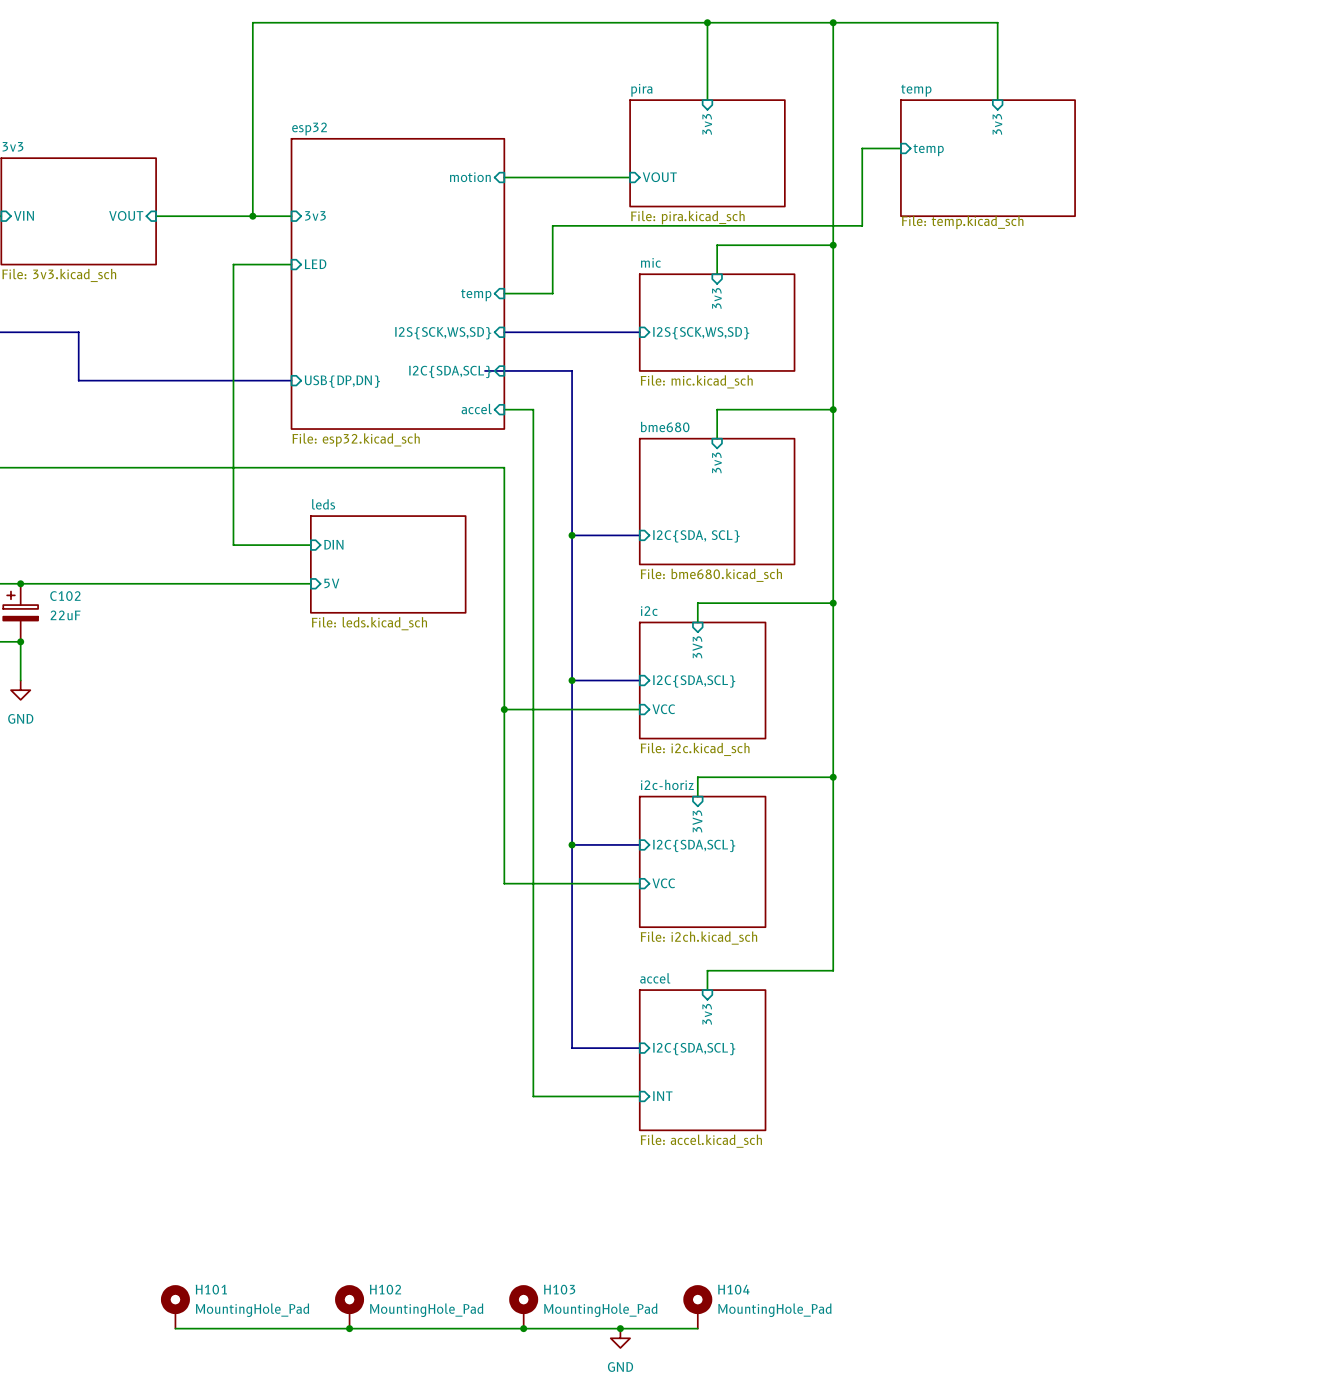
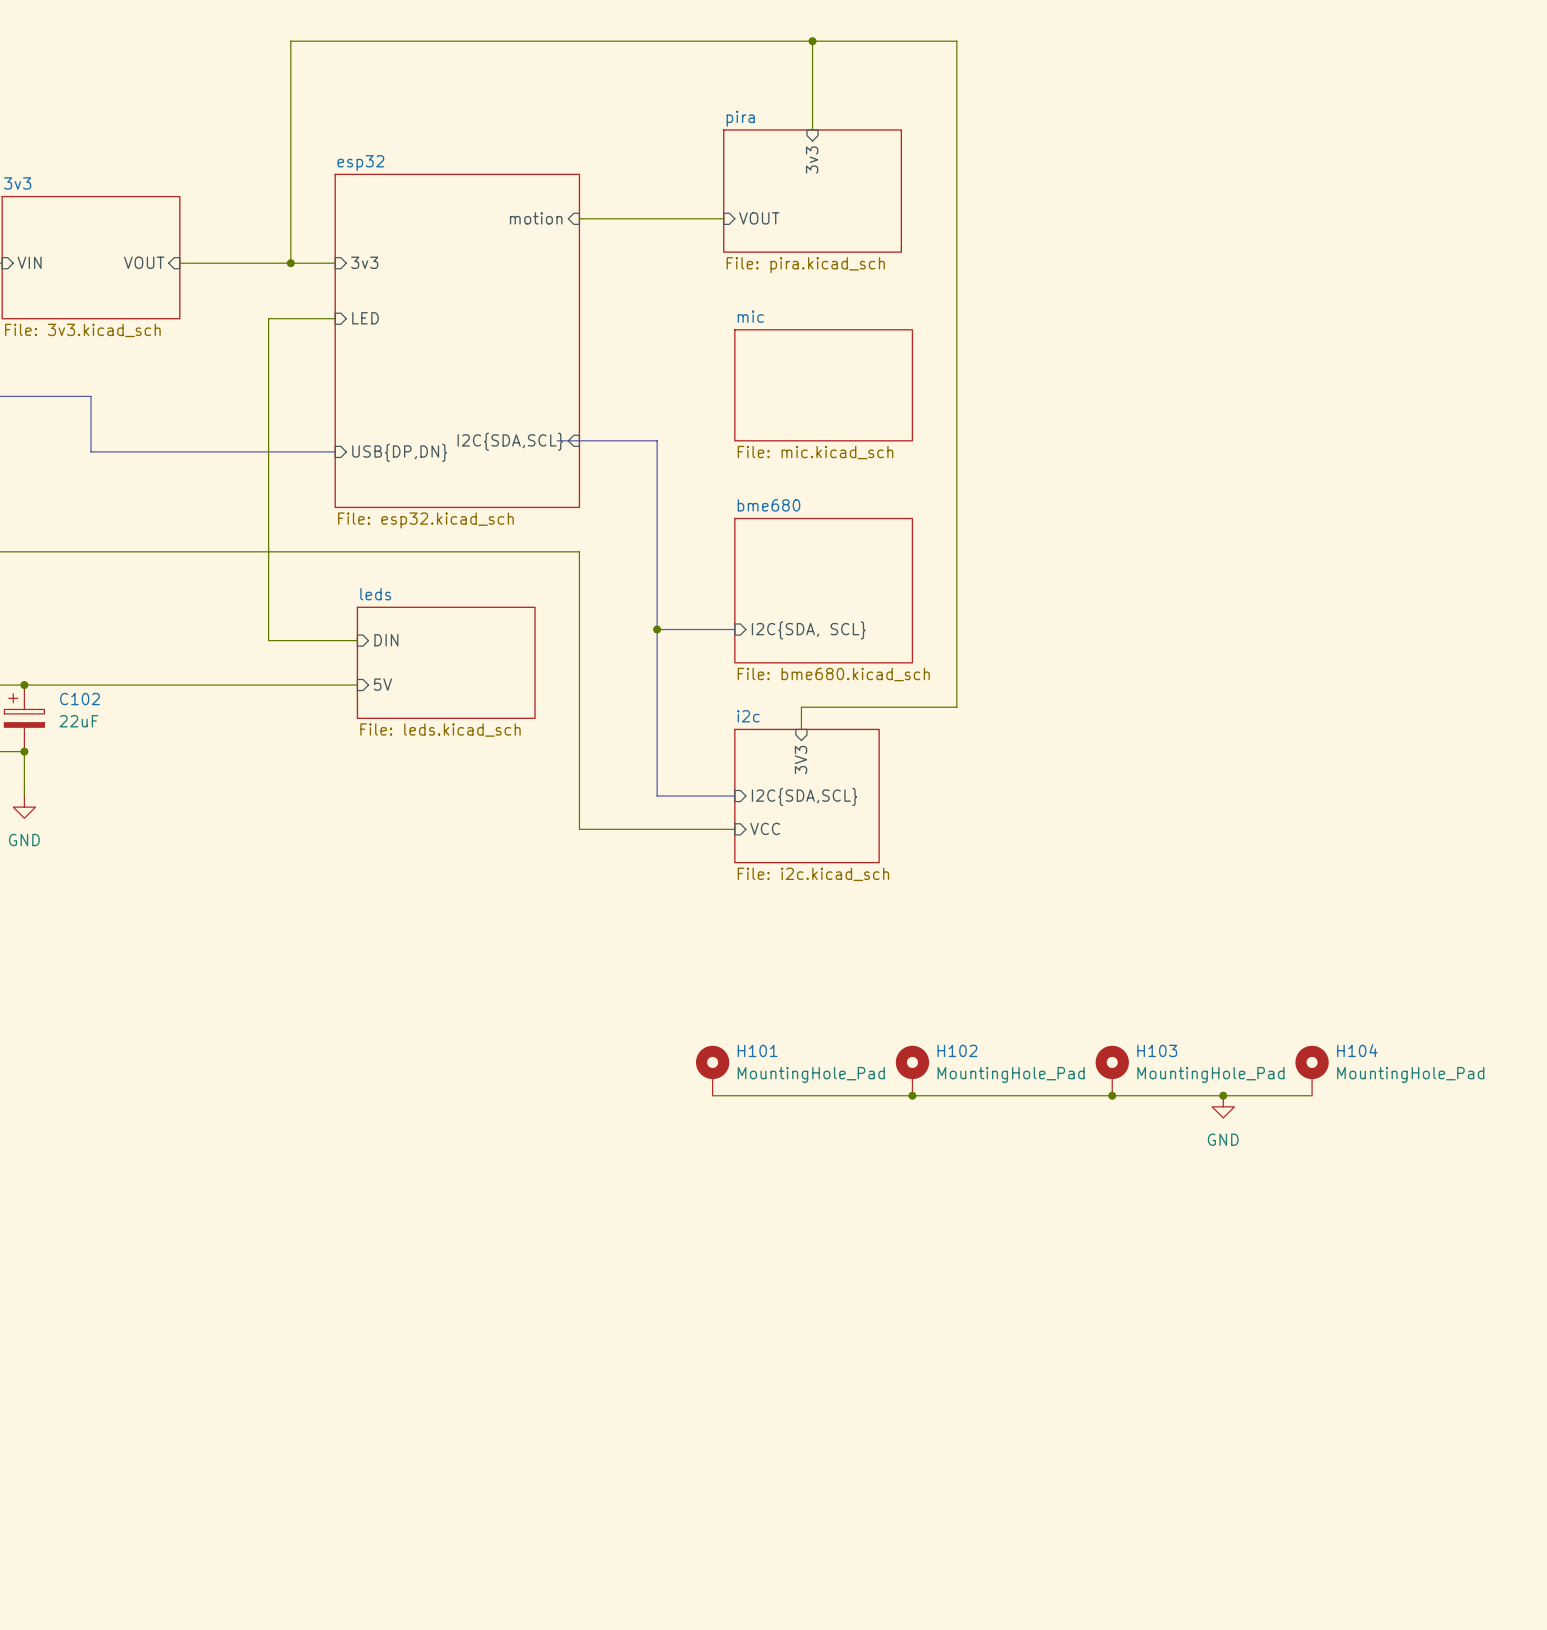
wire: (833, 22) (997, 22) (997, 100) -> none
junction: (833, 22) -> none
sheet pin: 3v3 (997, 124) -> none
wire: (900, 148) (862, 148) (862, 225) (552, 225) (552, 293) (504, 293) -> none
sheet pin: temp (928, 150) -> none
sheet temp: File: temp.kicad_sch (988, 158) -> none
wire: (833, 245) (717, 245) (717, 274) -> none
junction: (833, 245) -> none
sheet pin: temp (476, 295) -> none
sheet pin: 3v3 (716, 298) -> none
bus: (504, 332) (639, 332) -> none
sheet pin: I2S{SCK,WS,SD} (443, 333) -> none
sheet pin: I2S{SCK,WS,SD} (701, 333) -> none
sheet pin: accel (476, 409) -> none
wire: (504, 409) (533, 409) (533, 1096) (639, 1096) -> none
wire: (833, 409) (717, 409) (717, 438) -> none
junction: (833, 409) -> none
sheet pin: 3v3 (716, 462) -> none
wire: (833, 603) (833, 970) (707, 970) (707, 990) -> none
junction: (833, 603) -> none
bus: (572, 680) (572, 1048) (639, 1048) -> none
junction: (572, 680) -> none
wire: (504, 709) (504, 883) (639, 883) -> none
junction: (504, 709) -> none
wire: (833, 777) (697, 777) (697, 796) -> none
junction: (833, 777) -> none
sheet pin: 3V3 (697, 821) -> none
bus: (572, 844) (639, 844) -> none
junction: (572, 844) -> none
sheet pin: I2C{SDA,SCL} (694, 845) -> none
sheet i2c-horiz: File: i2ch.kicad_sch (702, 861) -> none
sheet pin: VCC (663, 883) -> none
wire: none -> (712, 1095) (1312, 1095)
junction: none -> (912, 1095)
junction: none -> (1112, 1095)
junction: none -> (1223, 1095)
power symbol: none -> GND (1223, 1106)
sheet pin: 3v3 (707, 1014) -> none
sheet pin: I2C{SDA,SCL} (694, 1049) -> none
sheet accel: File: accel.kicad_sch (702, 1060) -> none
sheet pin: INT (662, 1096) -> none
H101 position: (175, 1306) -> (712, 1070)
H102 position: (349, 1306) -> (912, 1070)
H103 position: (523, 1306) -> (1112, 1070)
H104 position: (697, 1306) -> (1312, 1070)
wire: (175, 1328) (697, 1328) -> none
junction: (349, 1328) -> none
junction: (523, 1328) -> none
junction: (620, 1328) -> none
power symbol: GND (620, 1338) -> none

